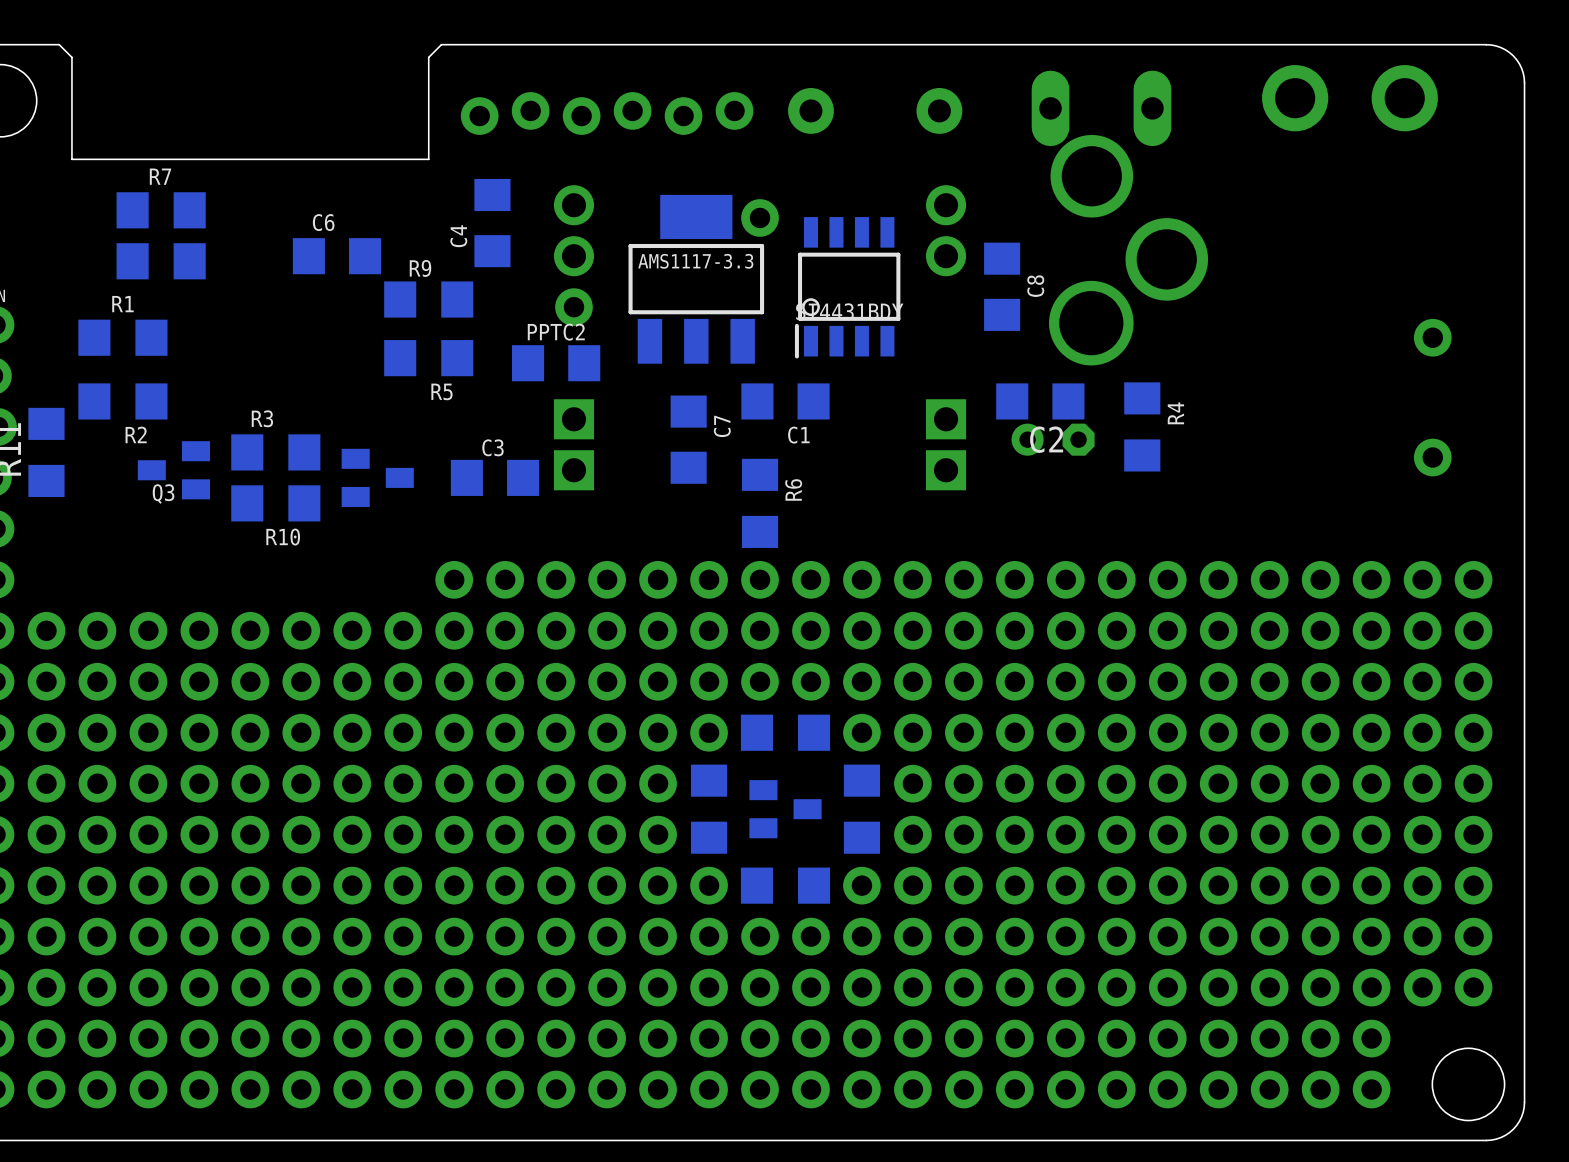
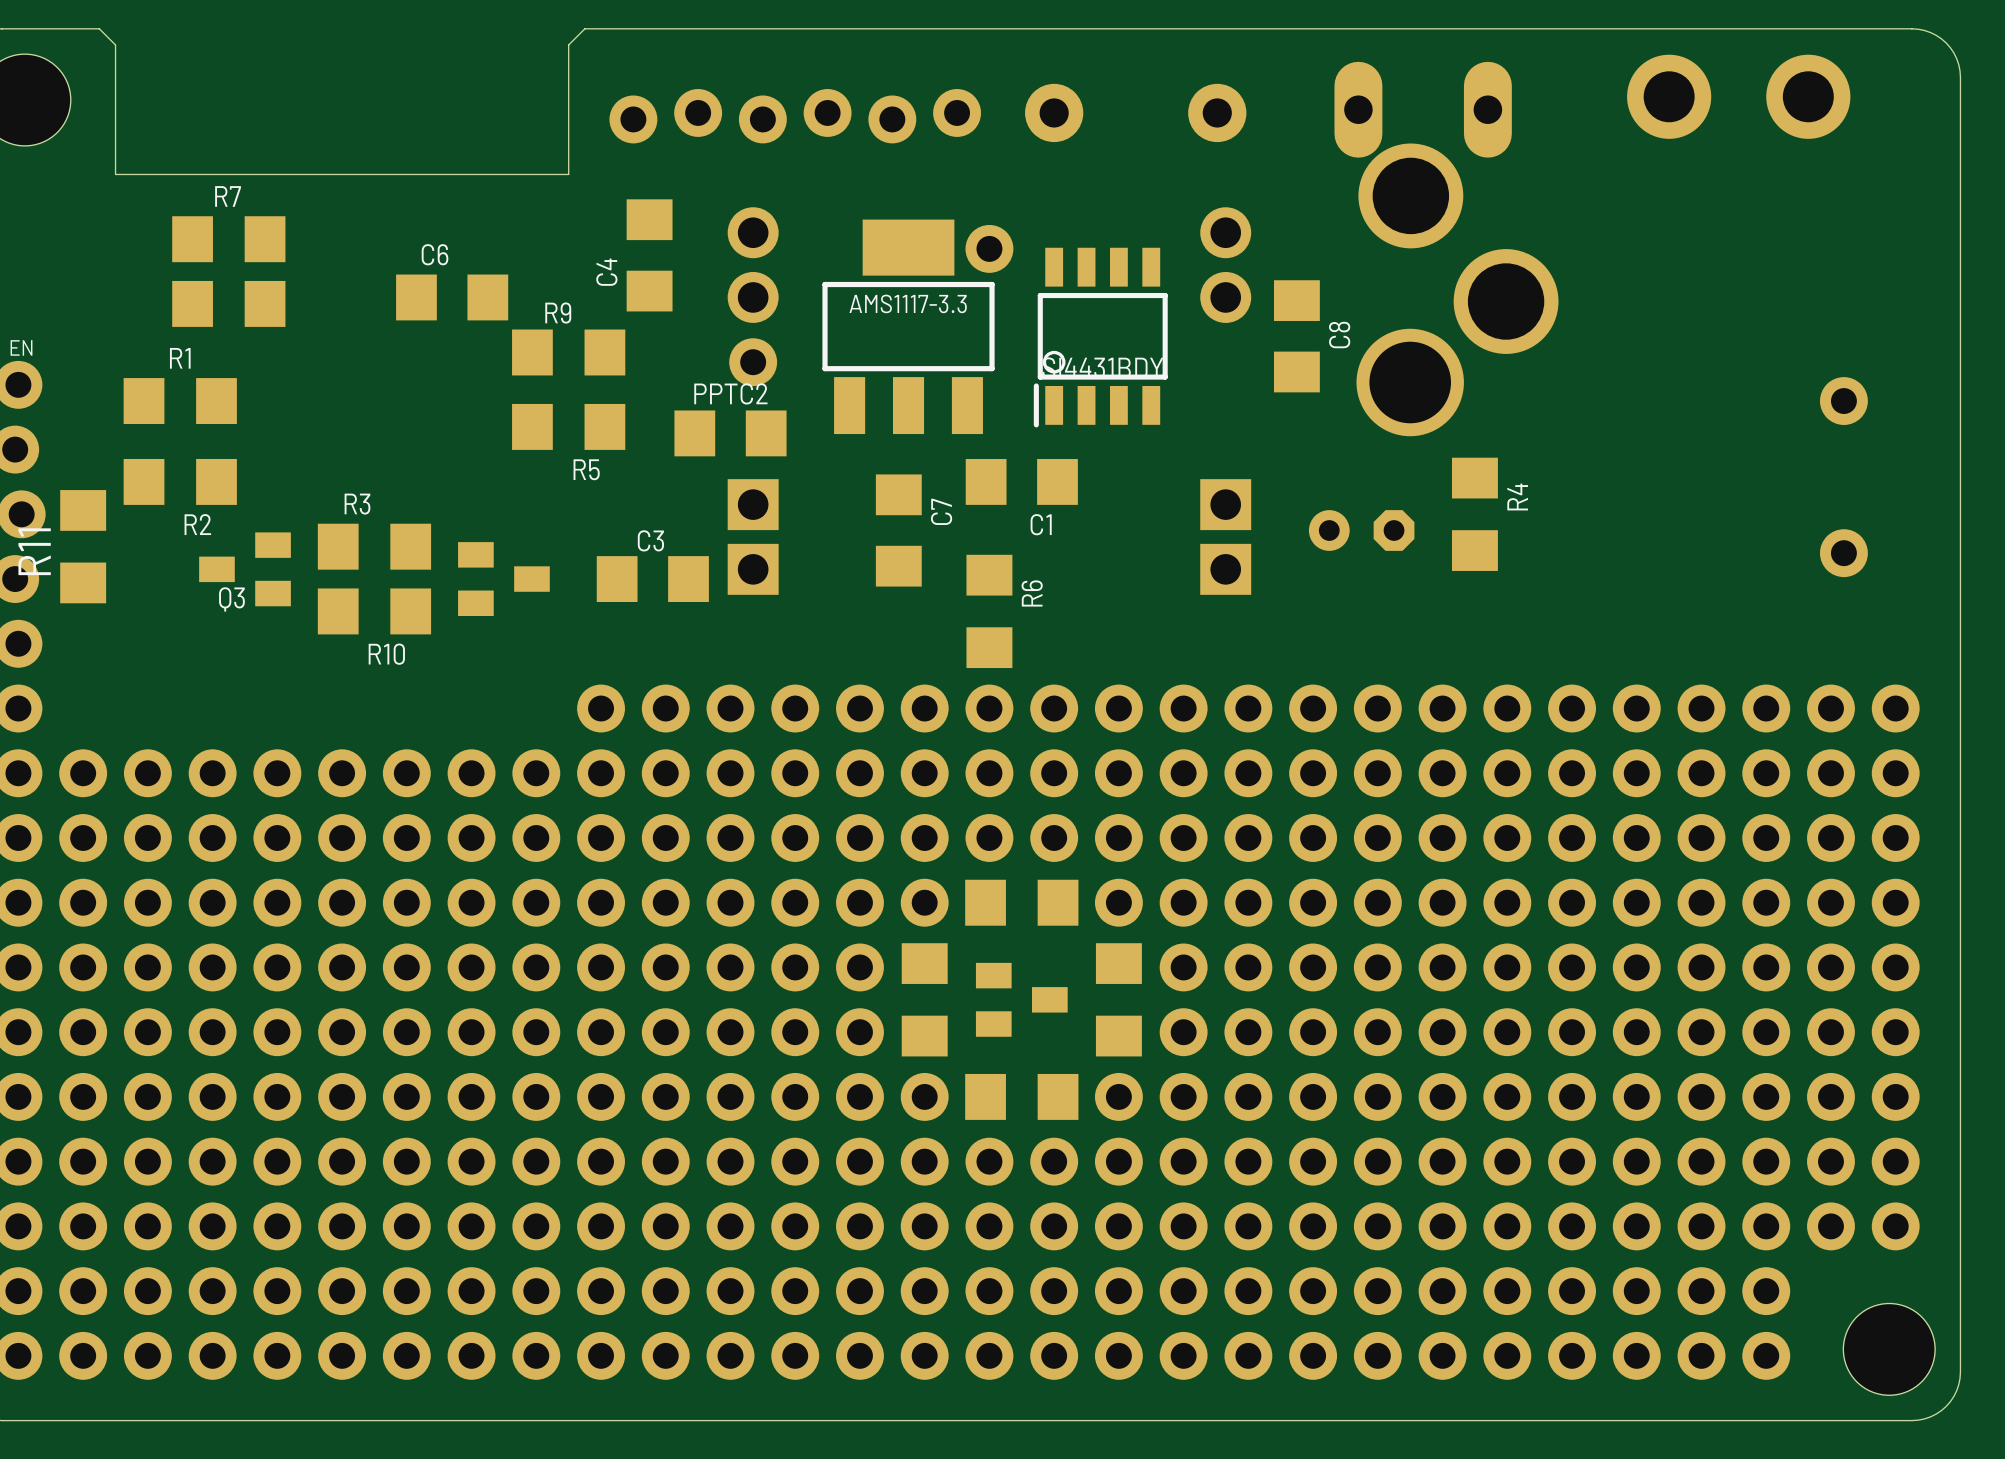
C2: (1040, 401) -> none

